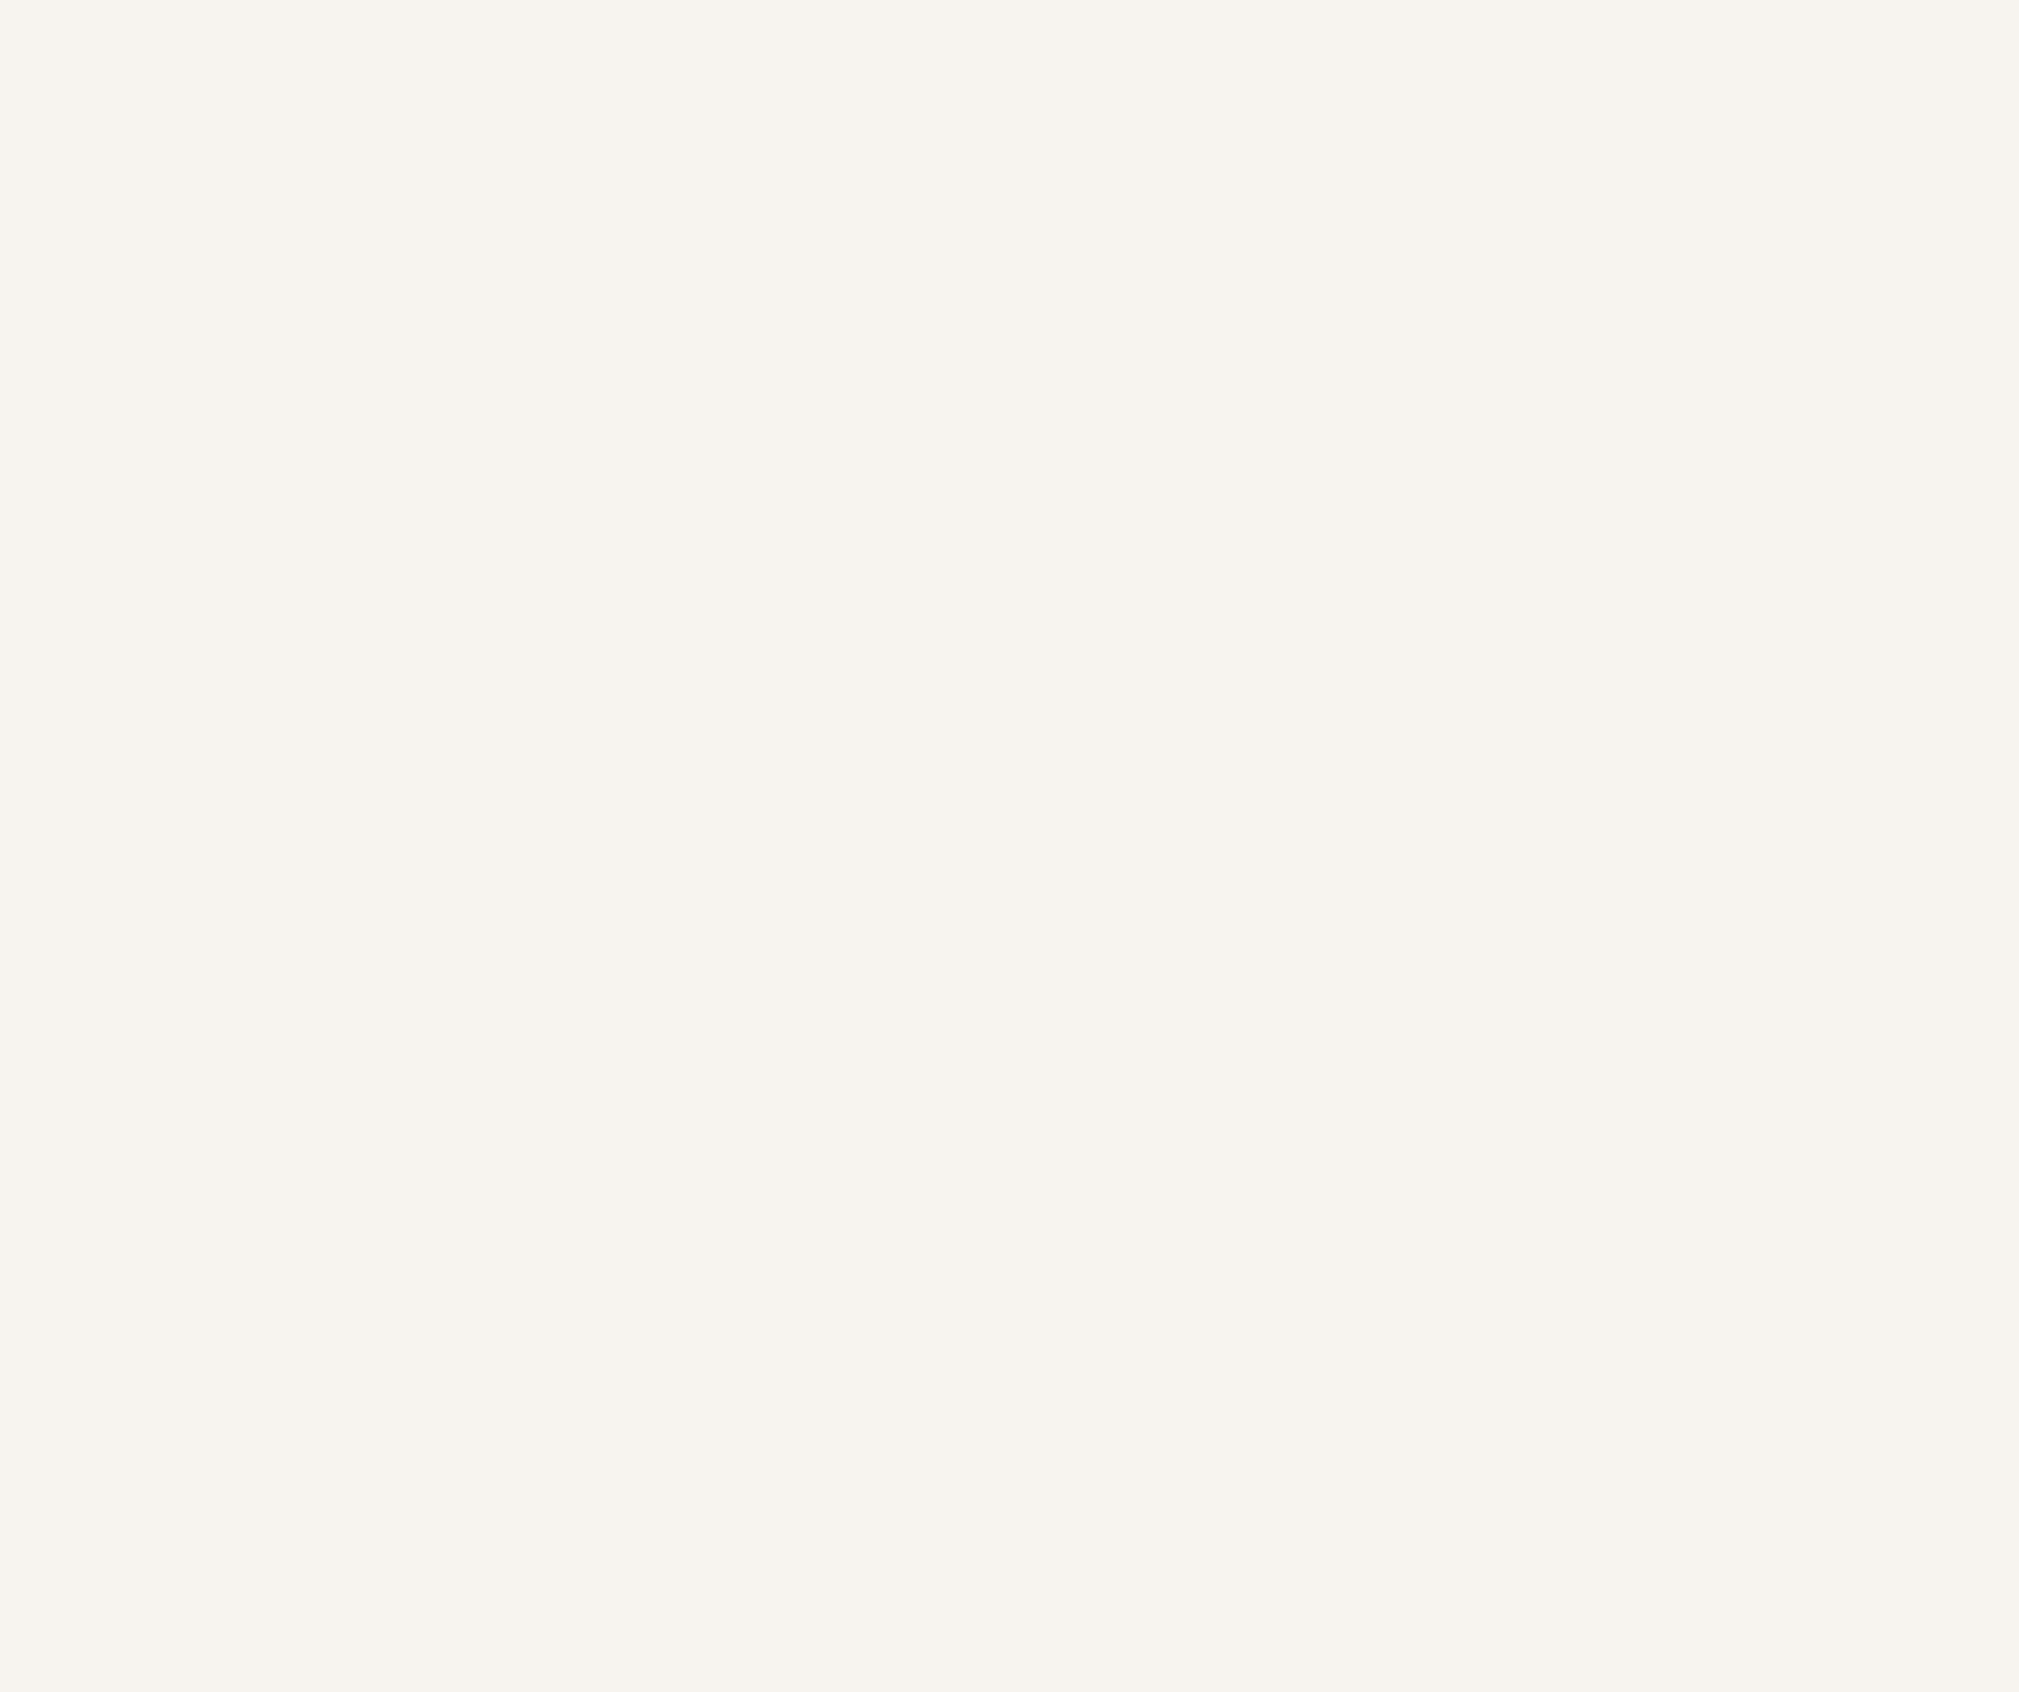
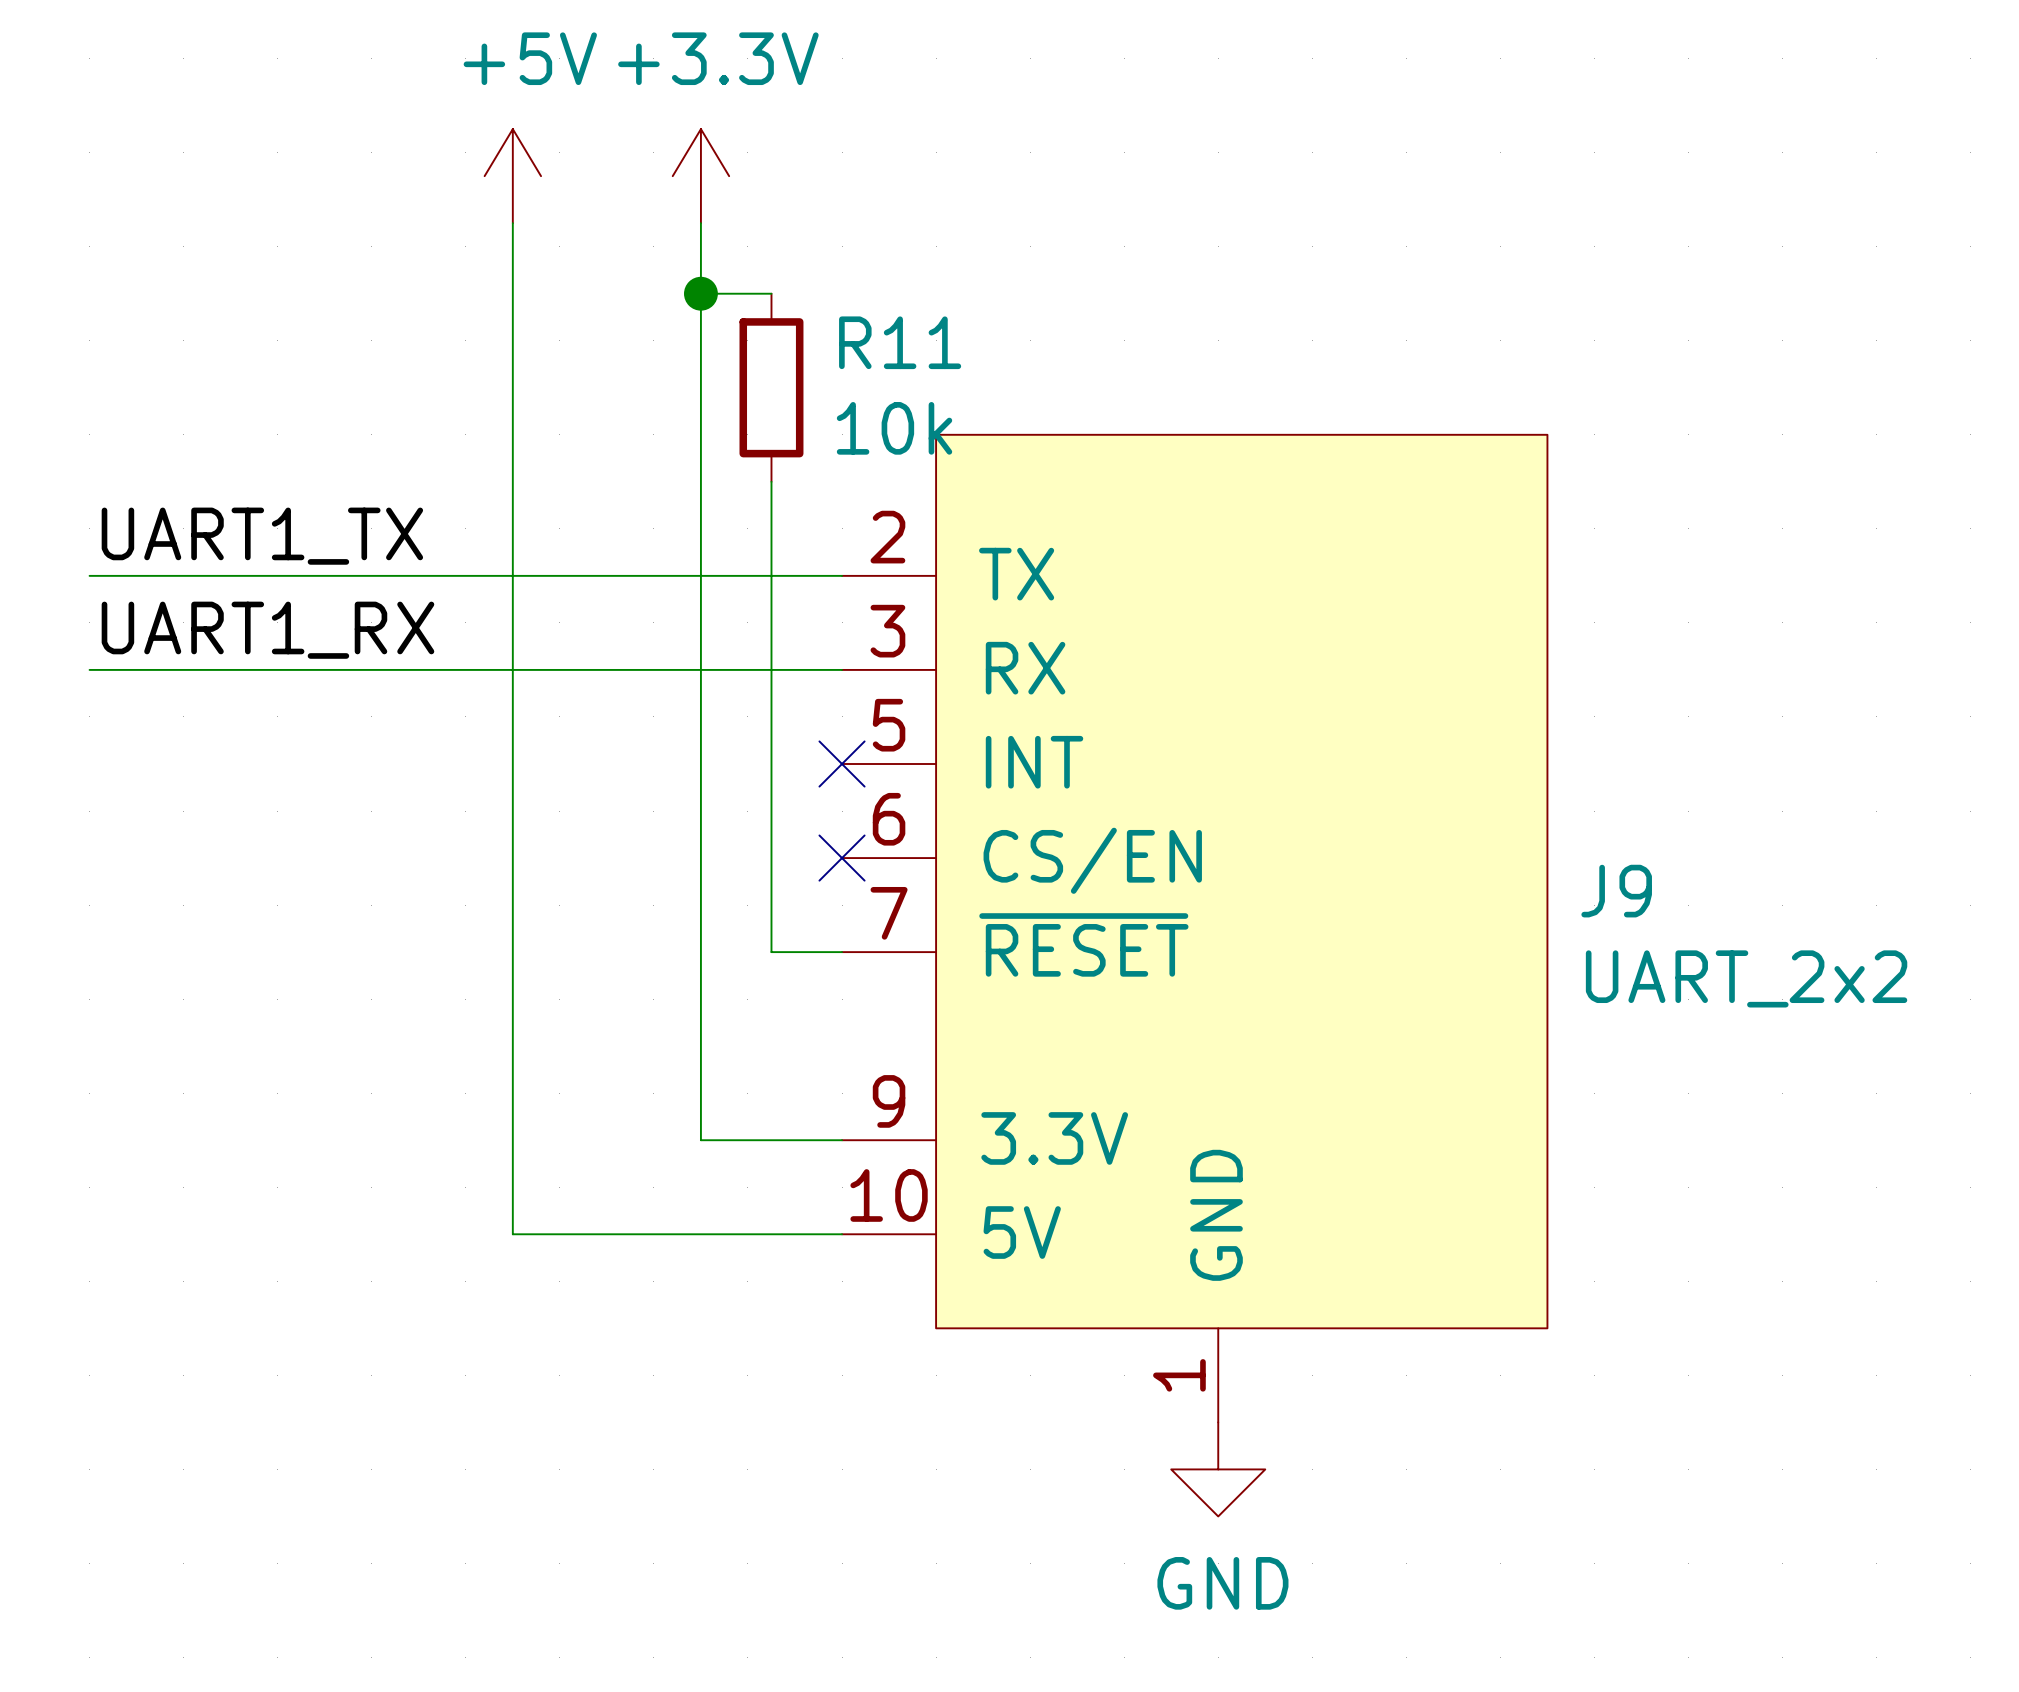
power symbol: none -> +5V (512, 176)
power symbol: none -> +3.3V (700, 176)
wire: none -> (512, 223) (512, 1234) (842, 1234)
wire: none -> (700, 223) (700, 1140) (842, 1140)
wire: none -> (700, 293) (771, 293)
junction: none -> (700, 293)
R11: none -> 10k (771, 387)
wire: none -> (771, 481) (771, 952) (842, 952)
label: none -> UART1_TX (262, 536)
wire: none -> (89, 575) (842, 575)
label: none -> UART1_RX (267, 630)
wire: none -> (89, 669) (842, 669)
no-connect mark: none -> (842, 764)
no-connect mark: none -> (842, 858)
J9: none -> UART_2x2 (1194, 928)
power symbol: none -> GND (1218, 1469)

